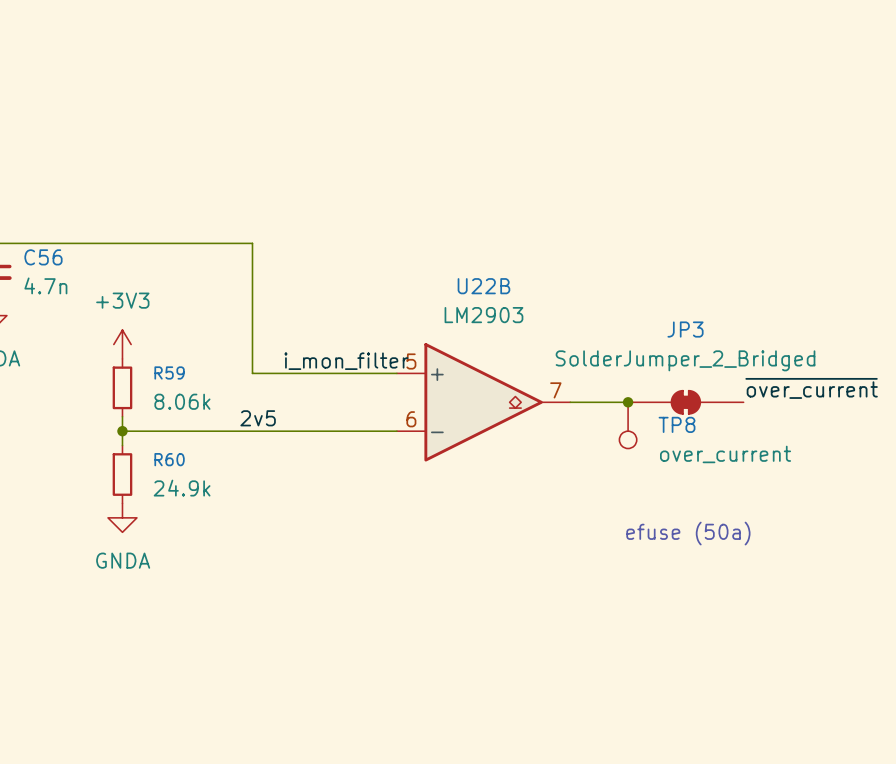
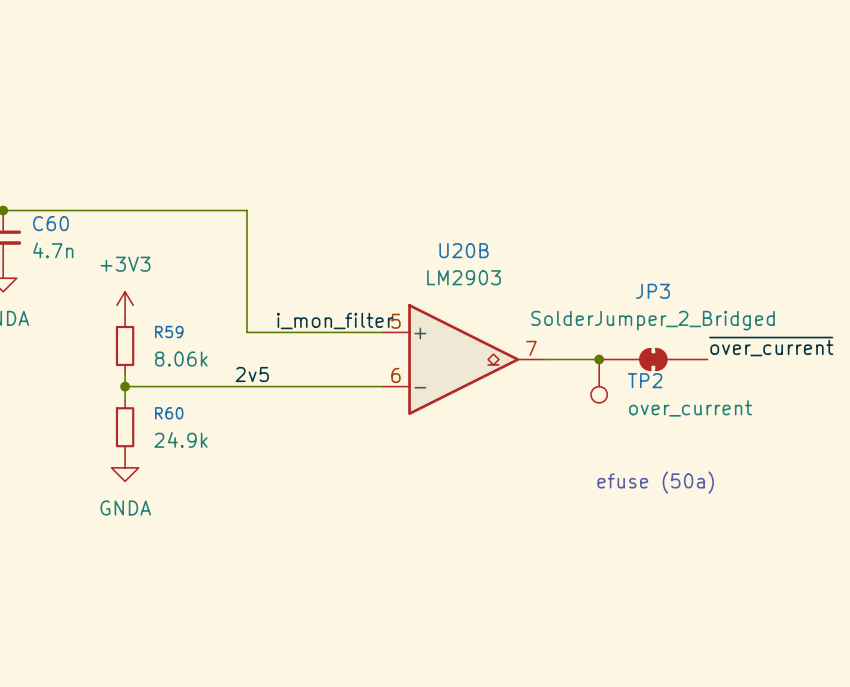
C56 name: C56 (43, 257) -> C60 (51, 223)
U22B name: U22B (483, 286) -> U20B (464, 250)
TP8 name: TP8 (677, 424) -> TP2 (645, 380)

